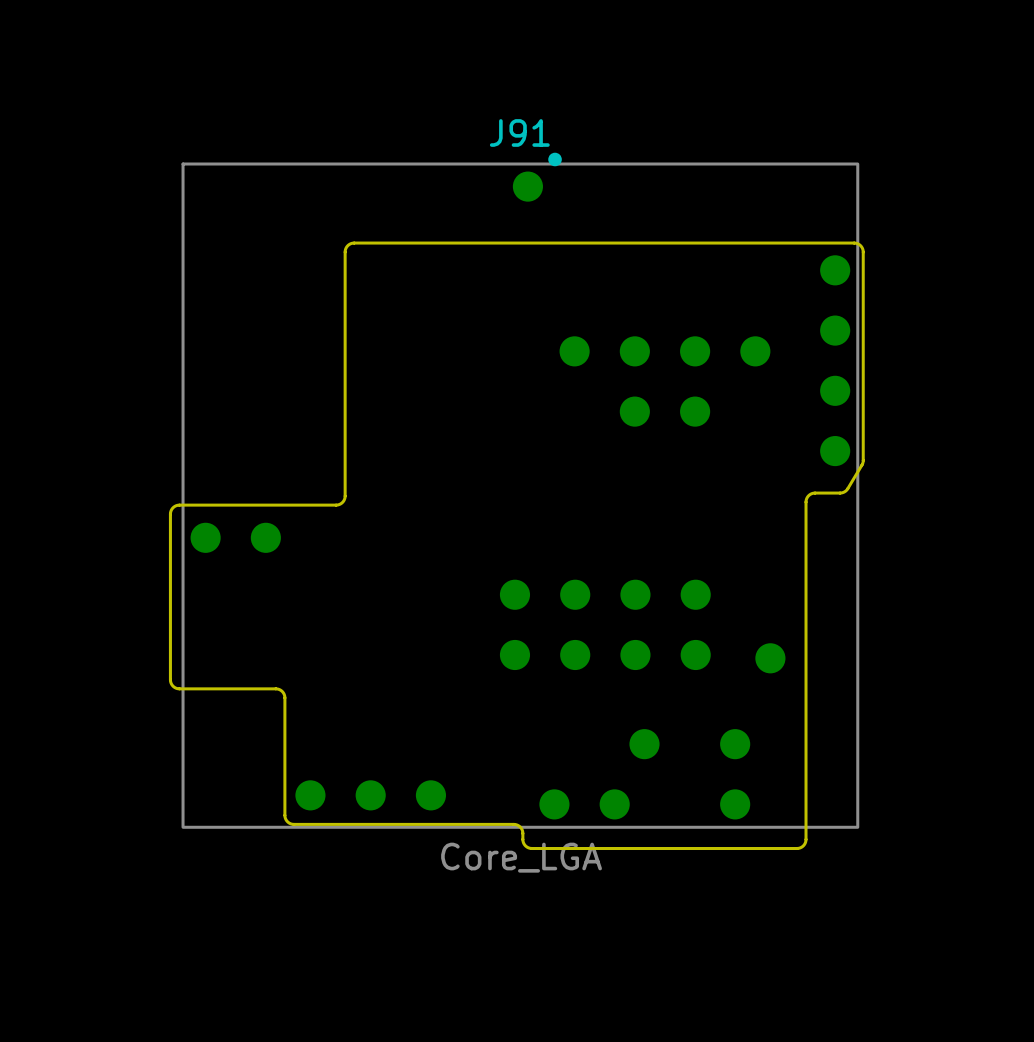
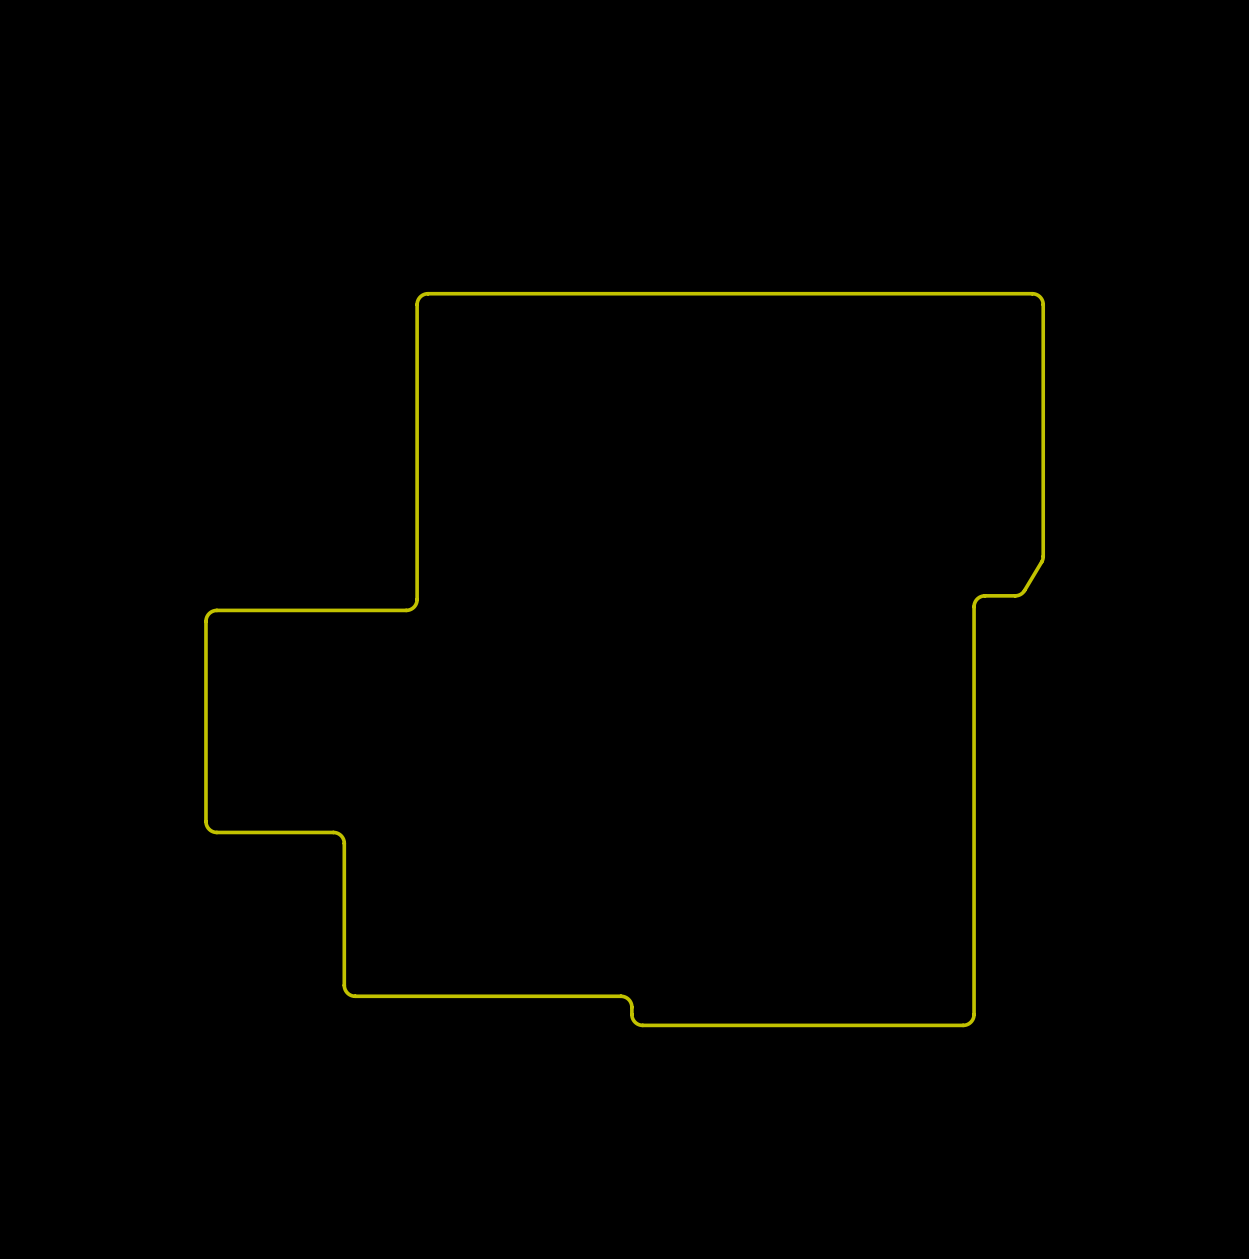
J91: Core_LGA (520, 490) -> none

